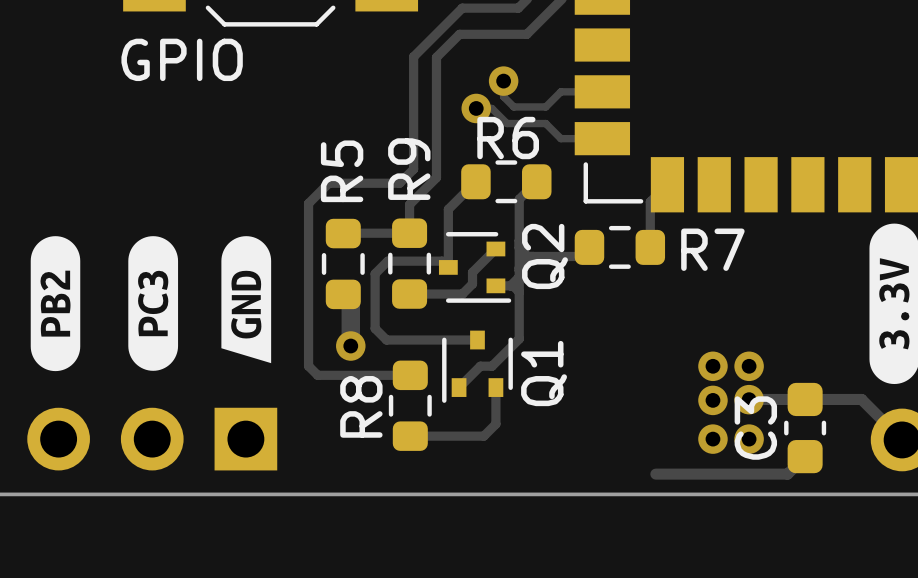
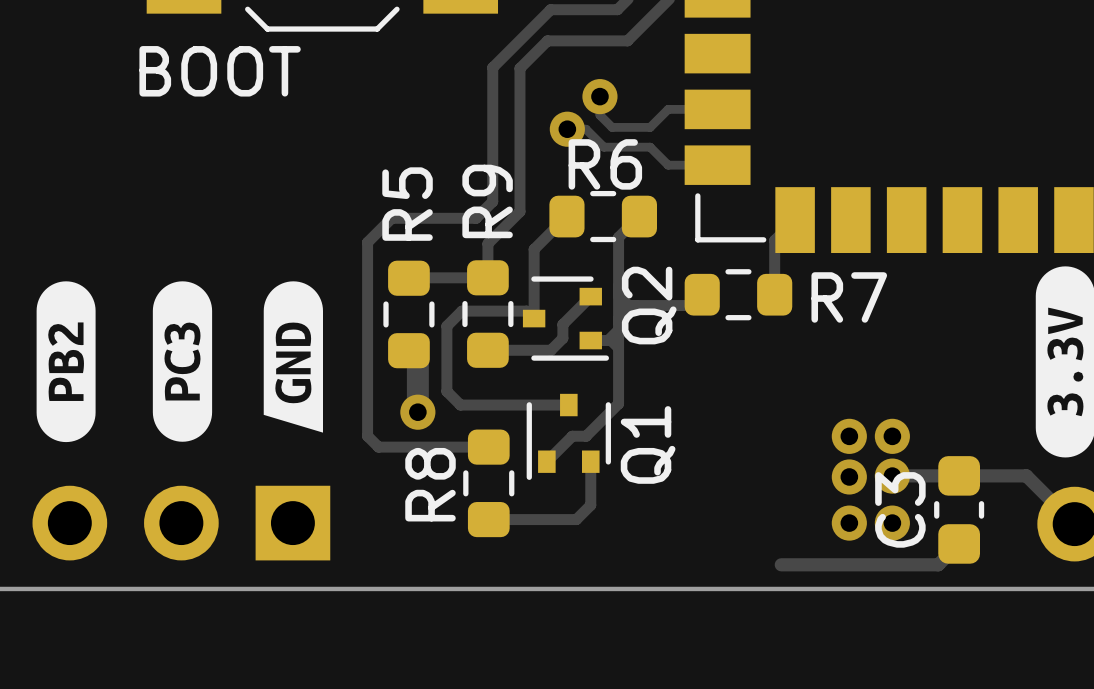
part value: GPIO (182, 59) -> BOOT (220, 71)

